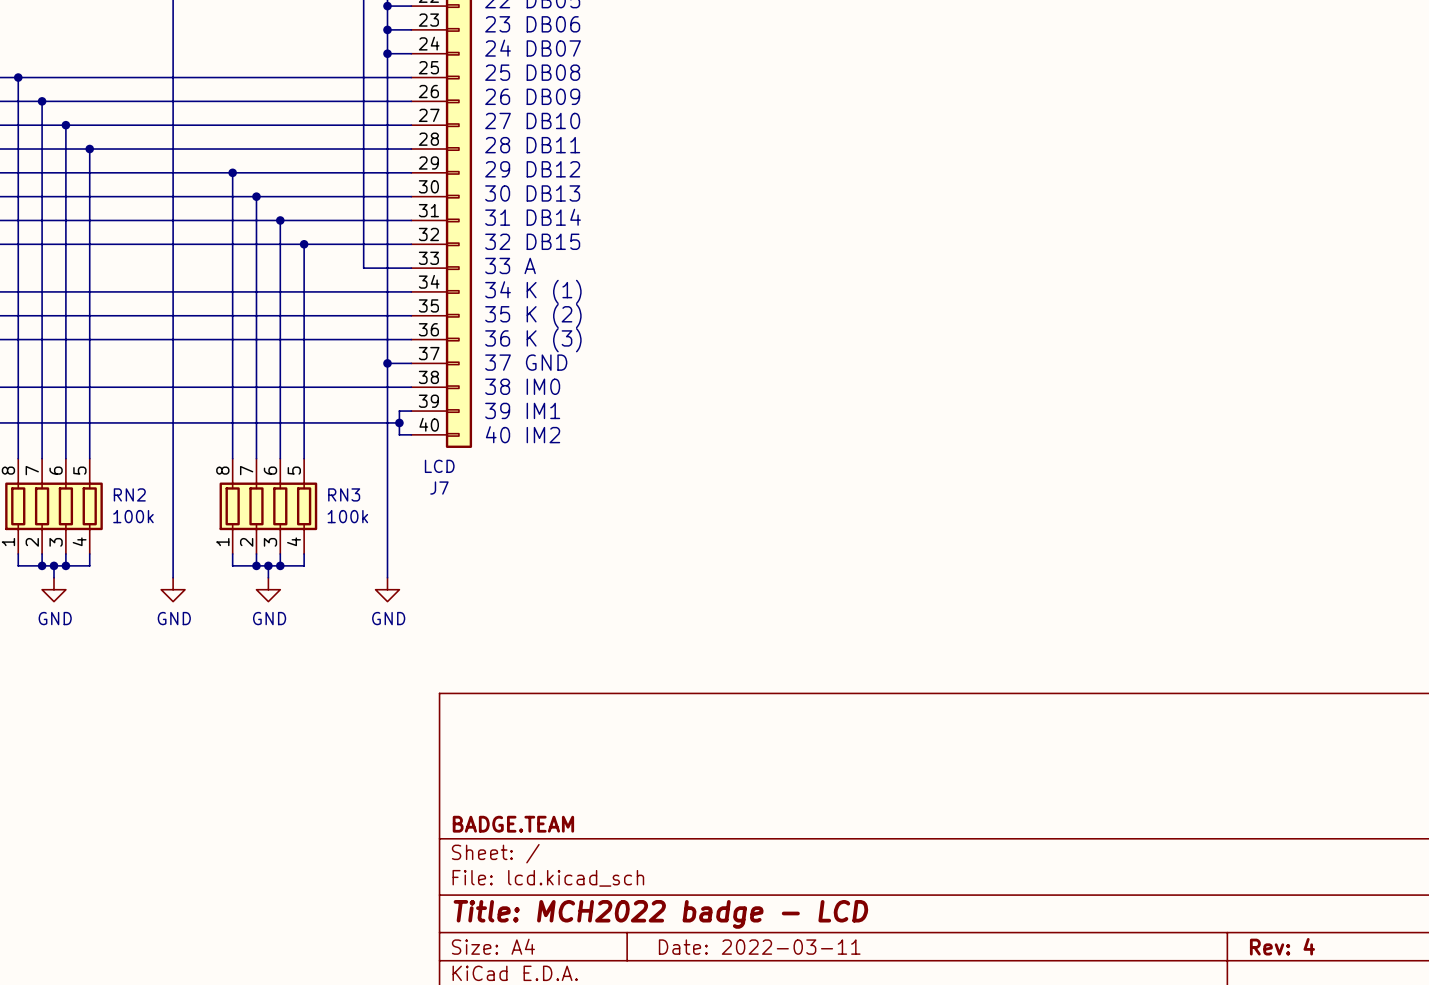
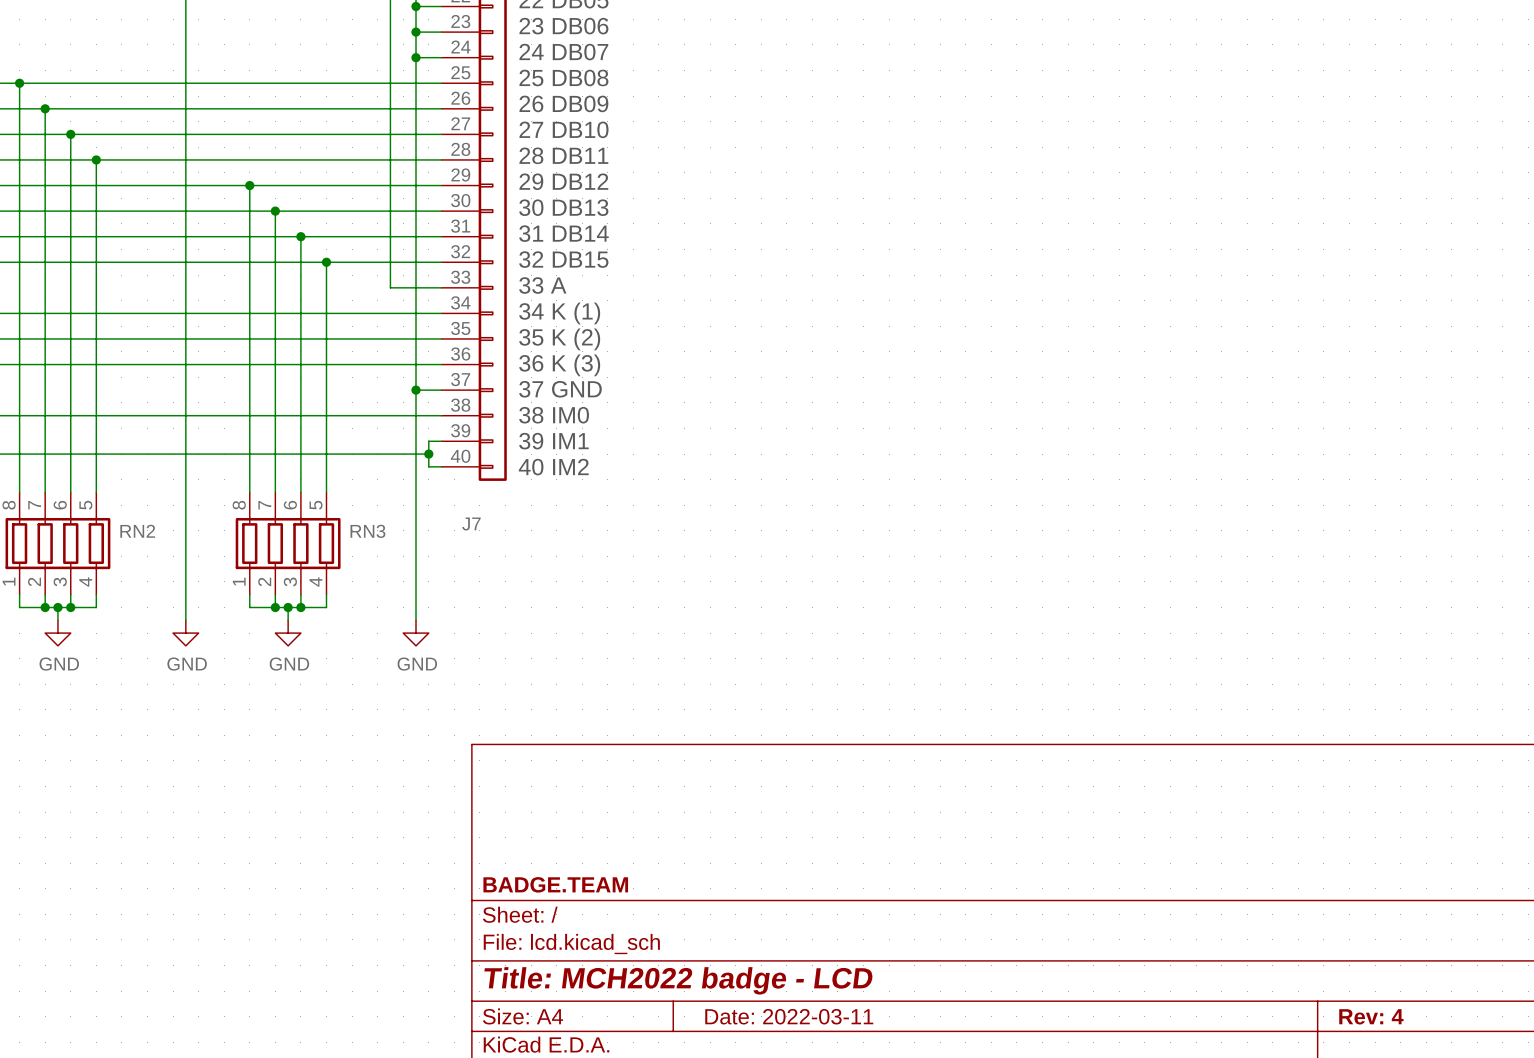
J7 value: LCD (439, 466) -> none
RN2 value: 100k (133, 516) -> none
RN3 value: 100k (347, 516) -> none

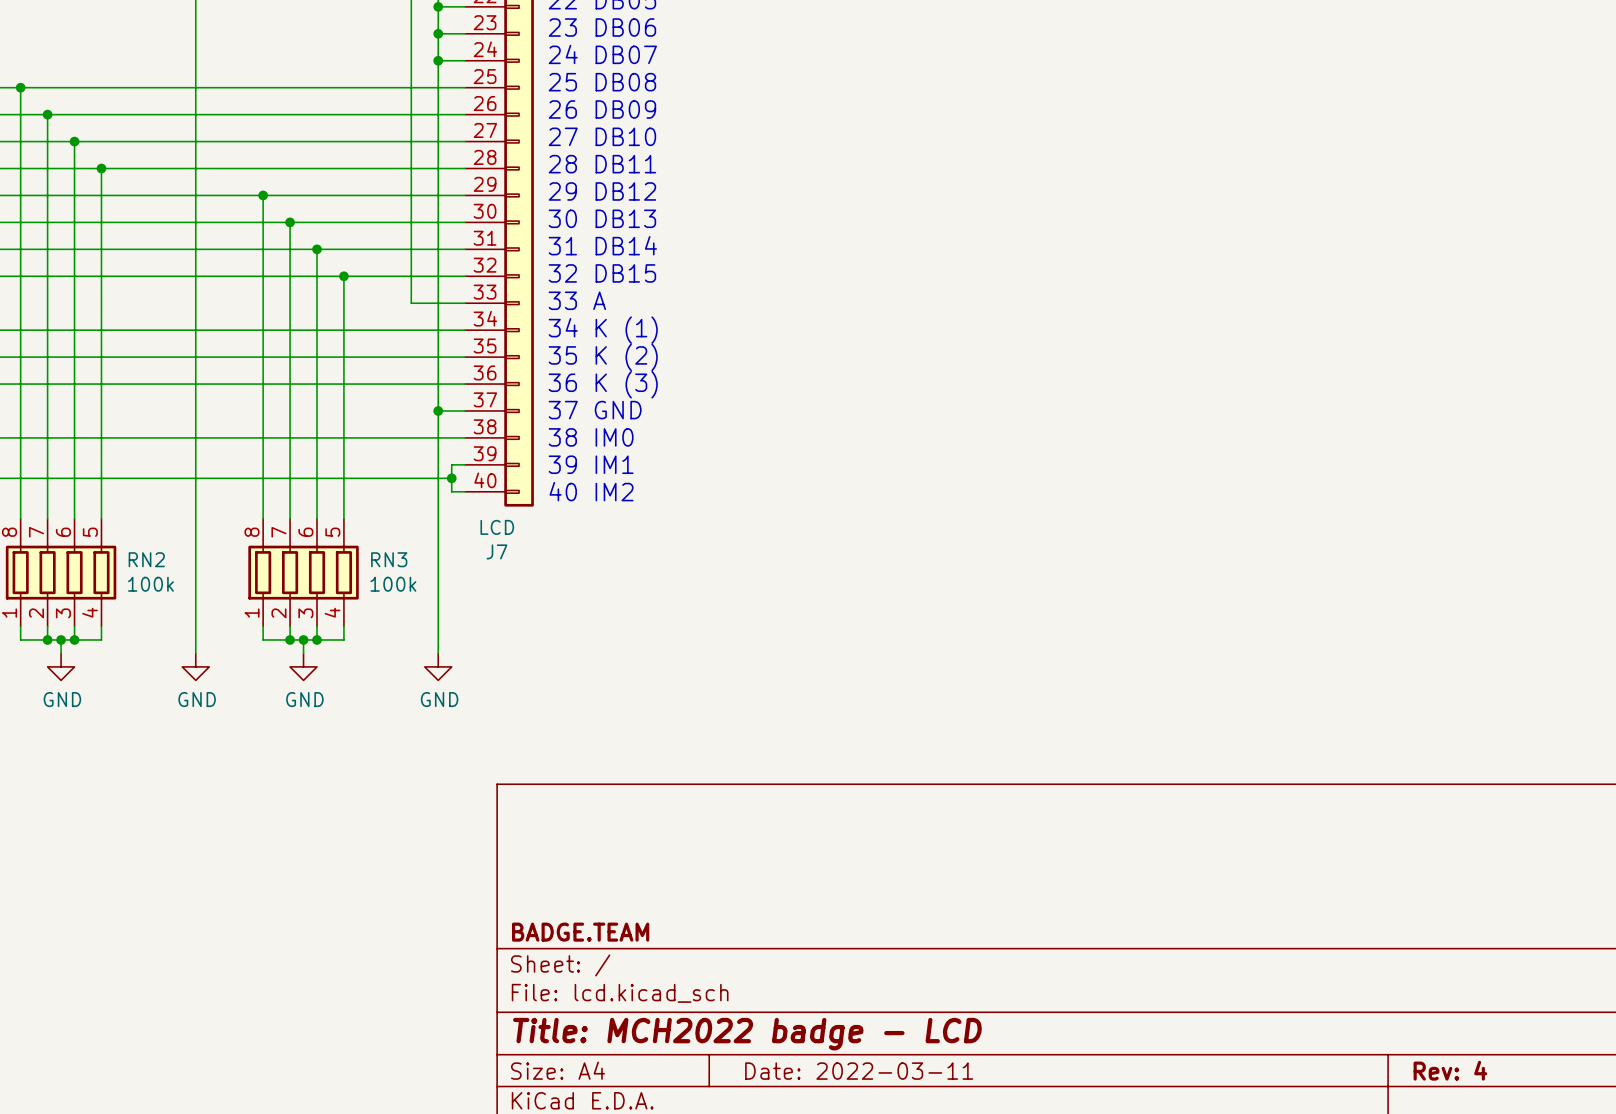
J7 value: none -> LCD (497, 527)
RN2 value: none -> 100k (150, 584)
RN3 value: none -> 100k (393, 584)

